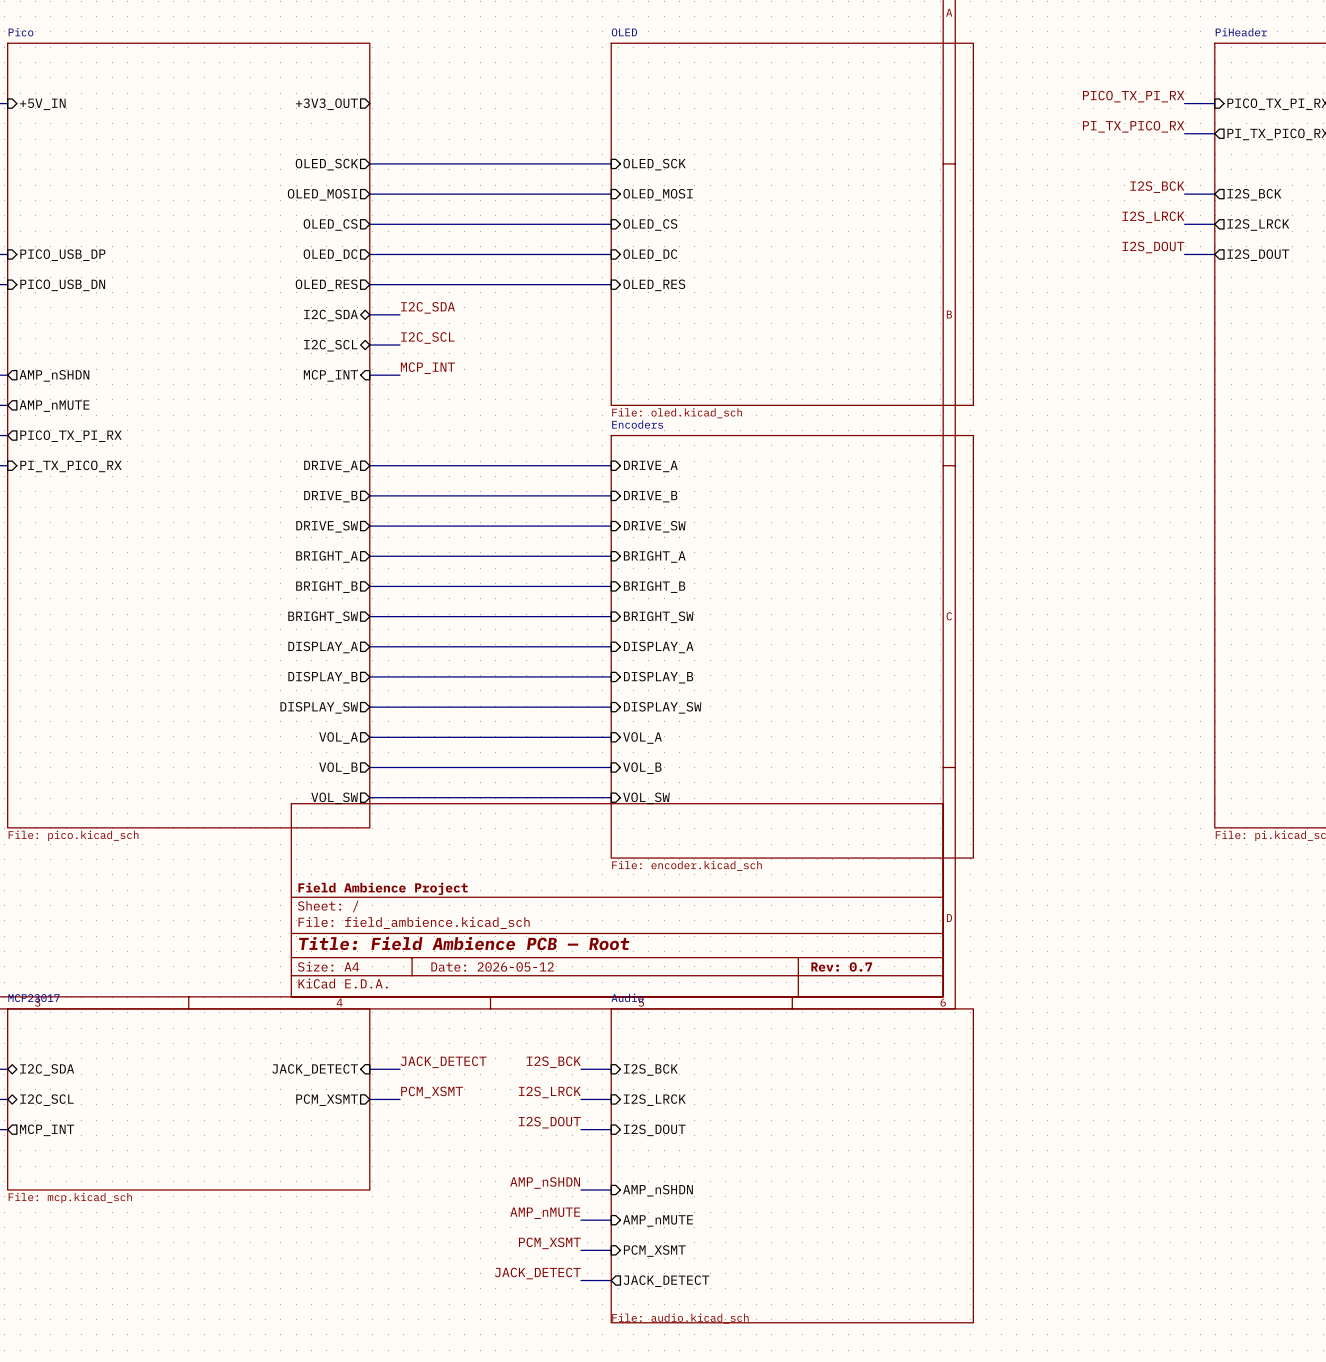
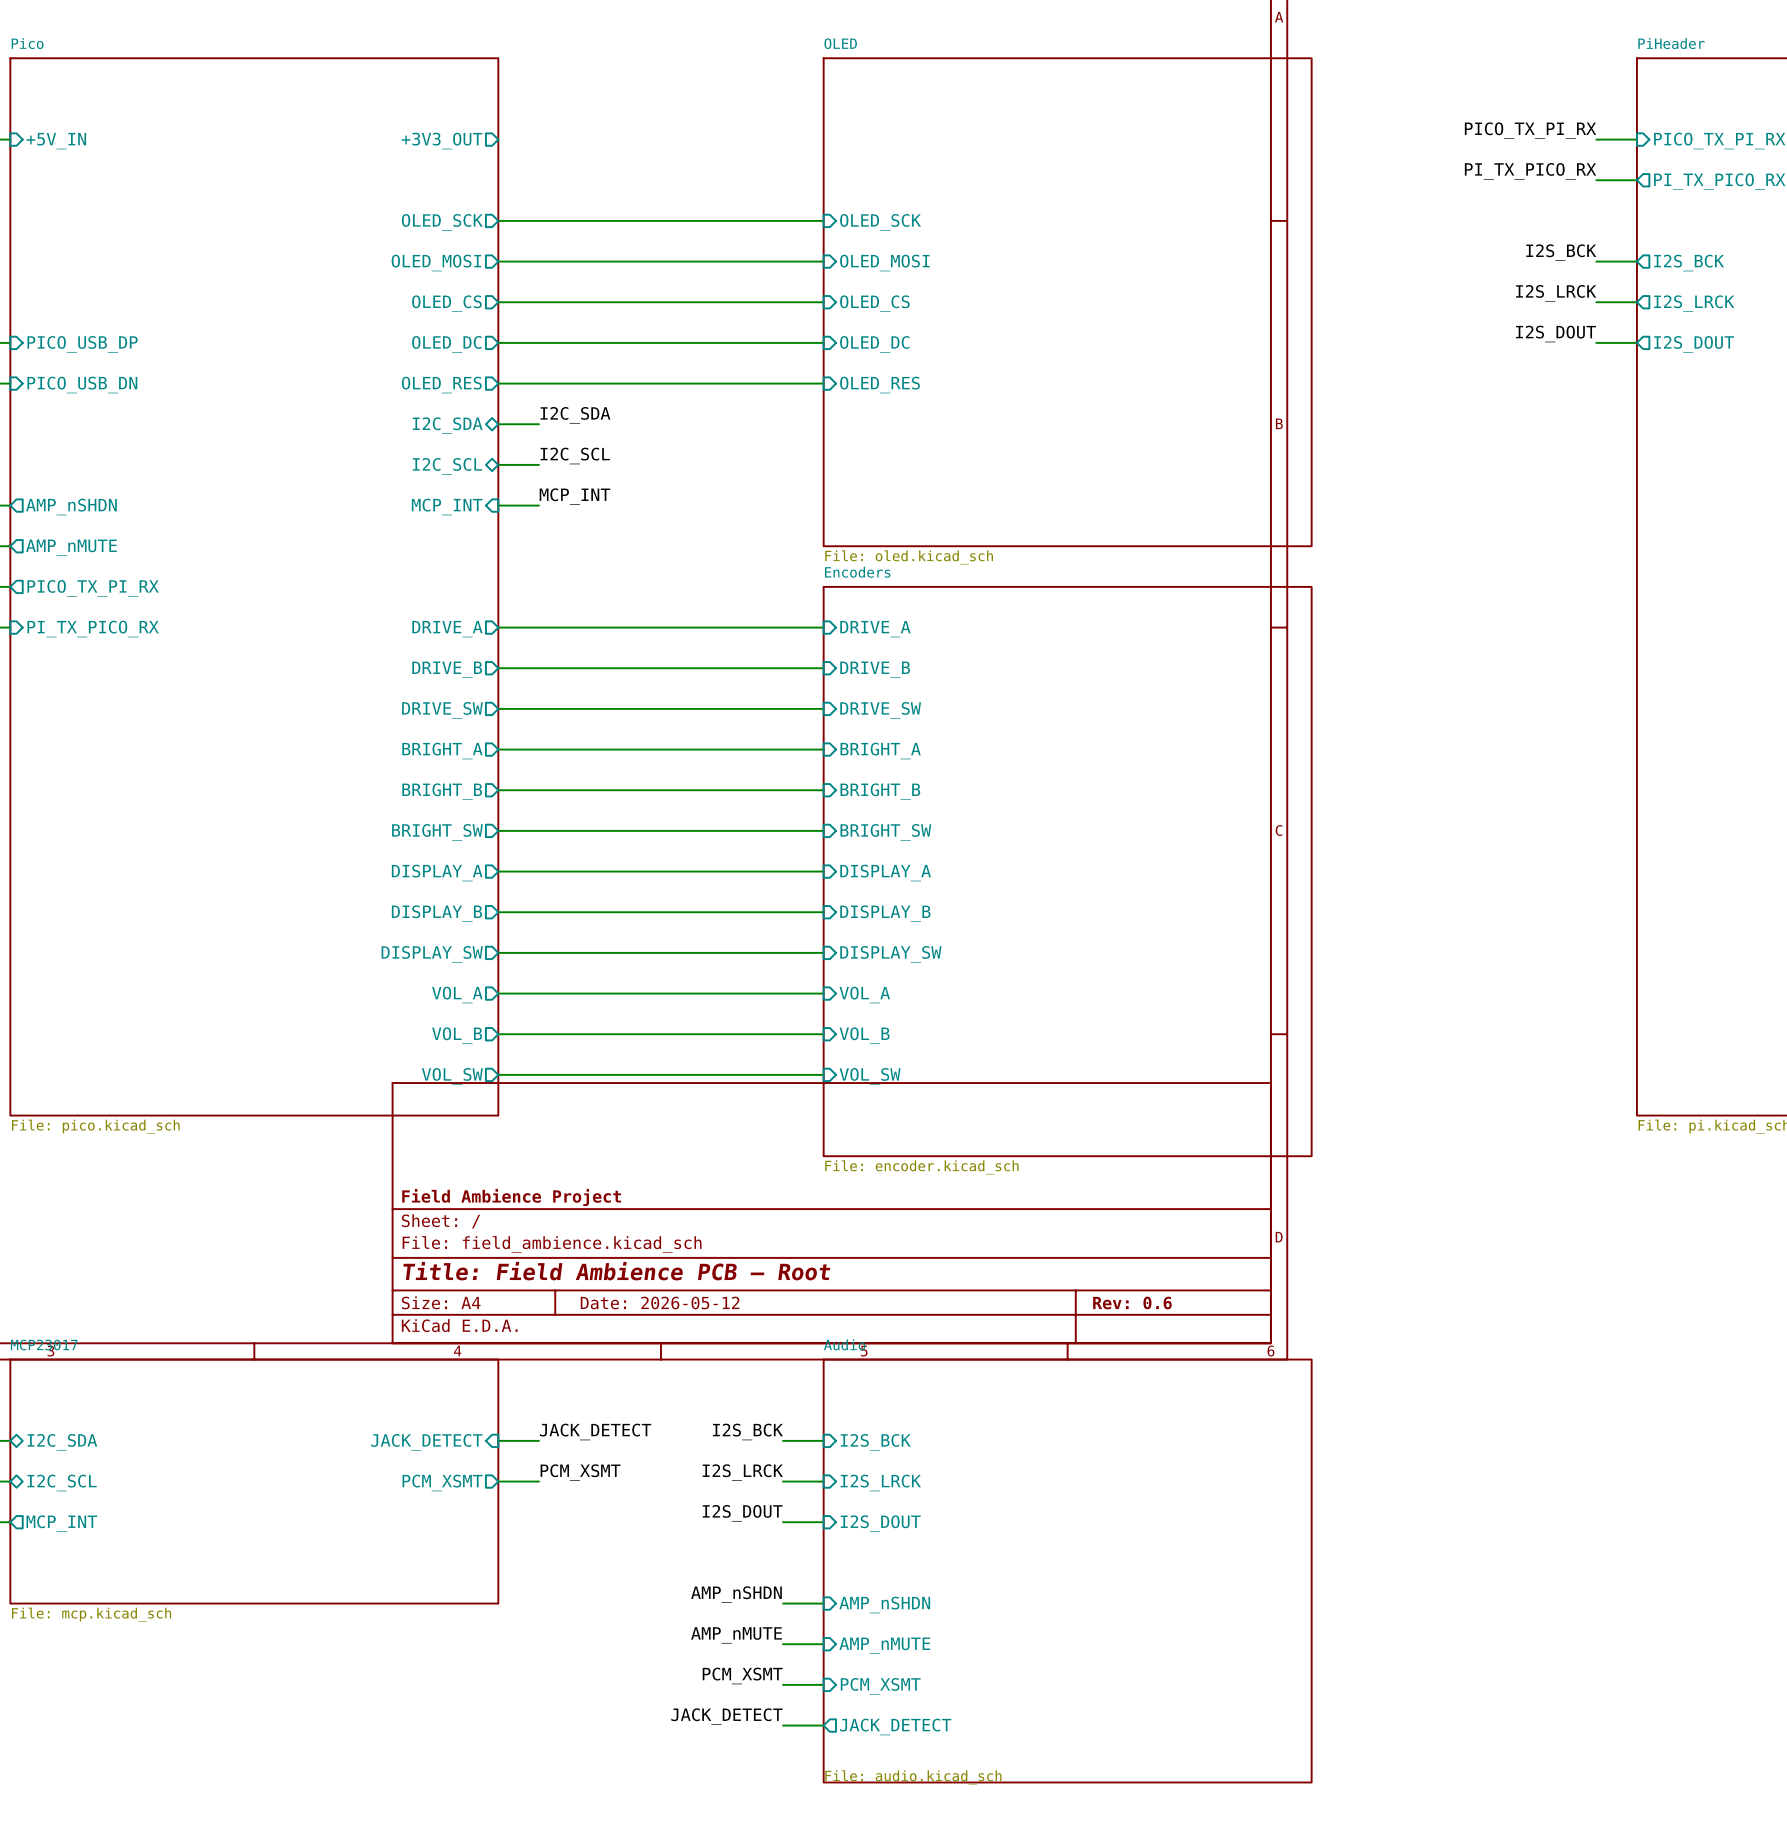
title block: Rev: 0.7 (841, 966) -> Rev: 0.6 (1132, 1302)

